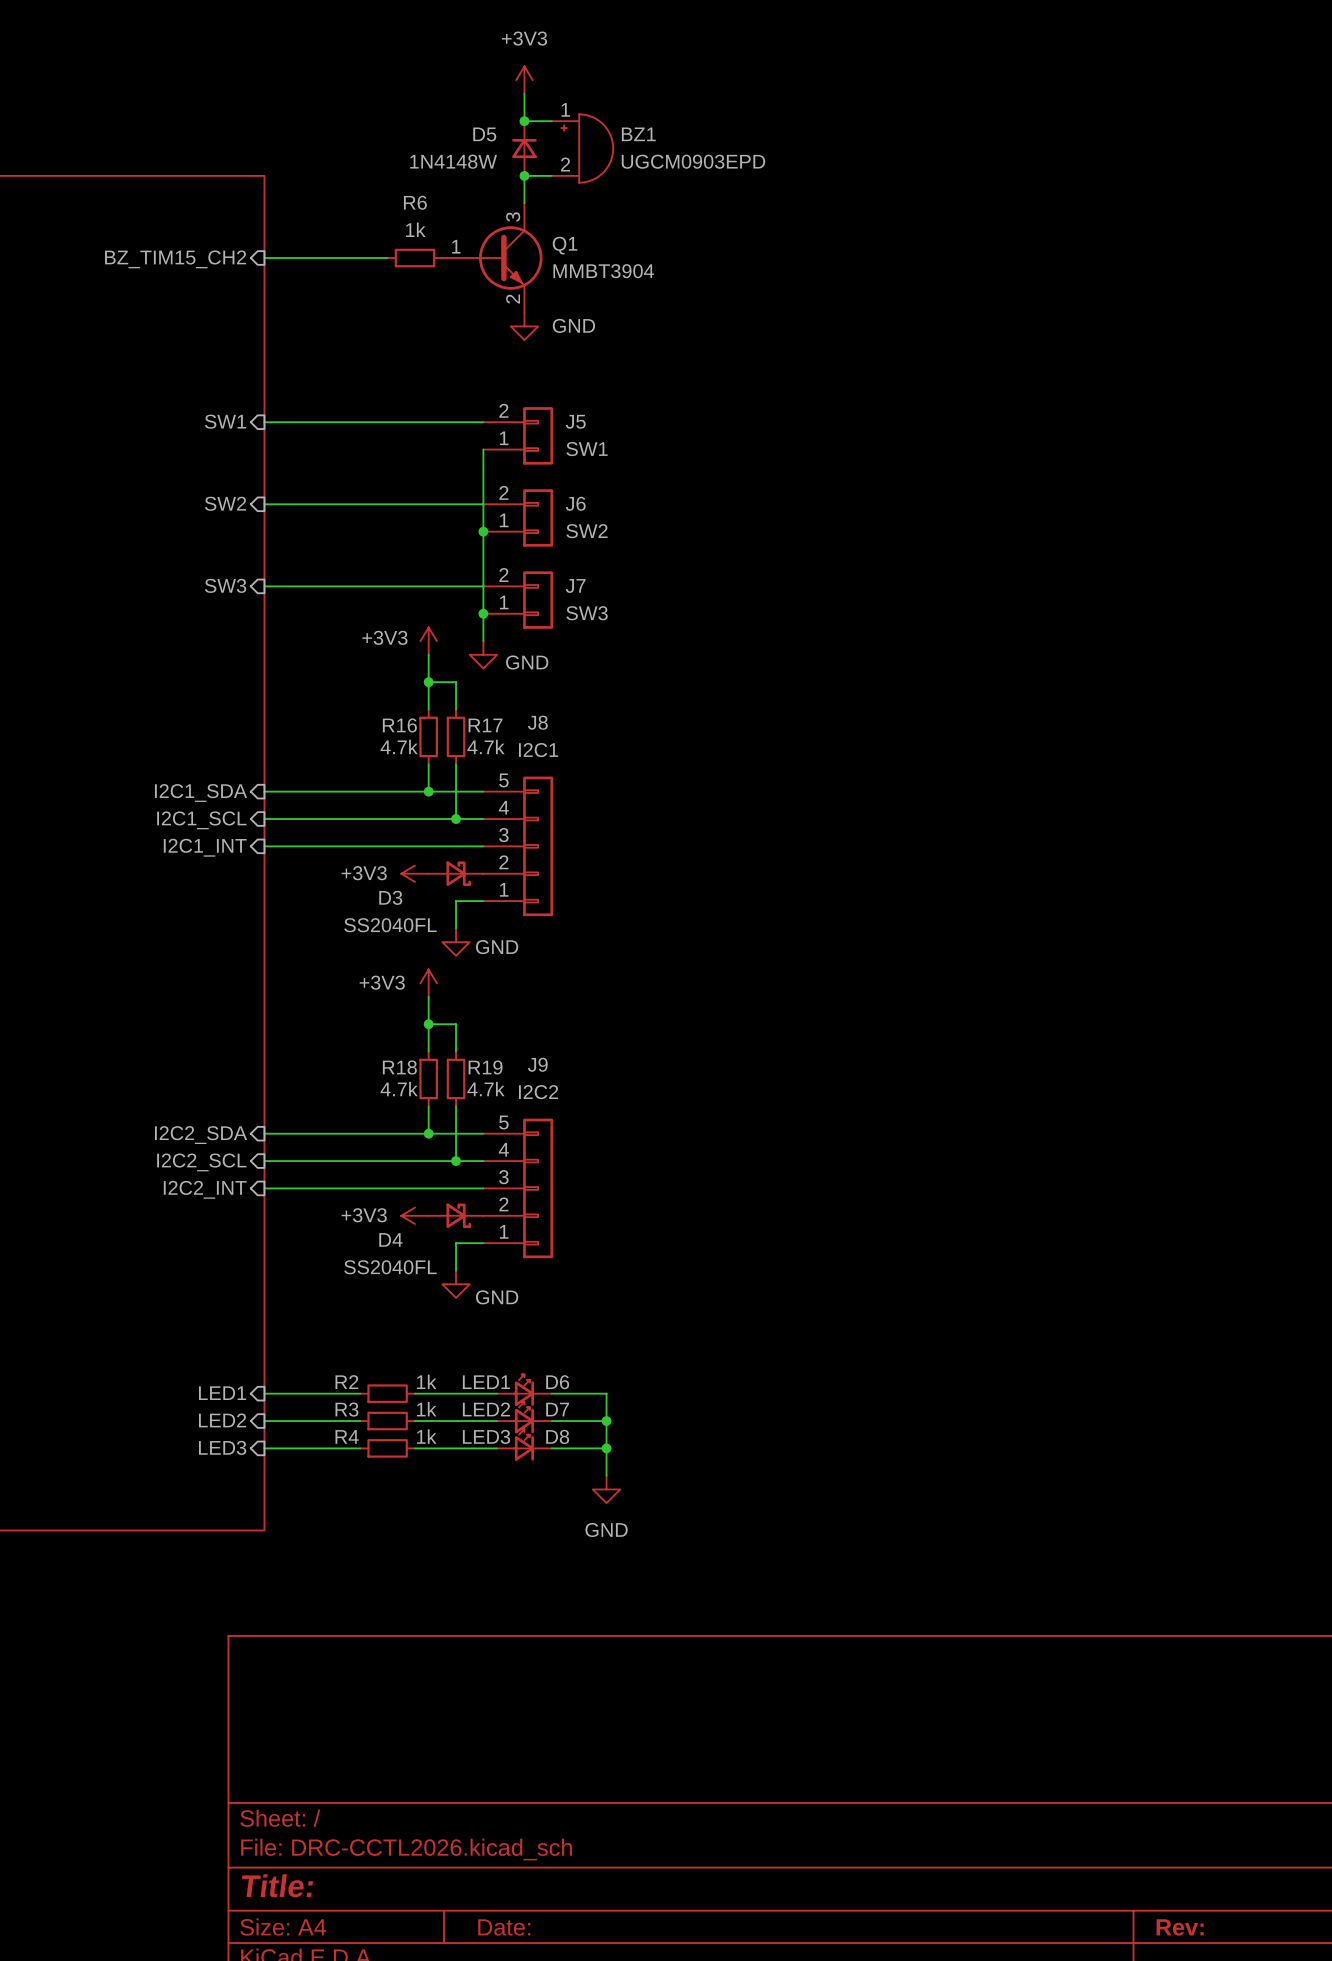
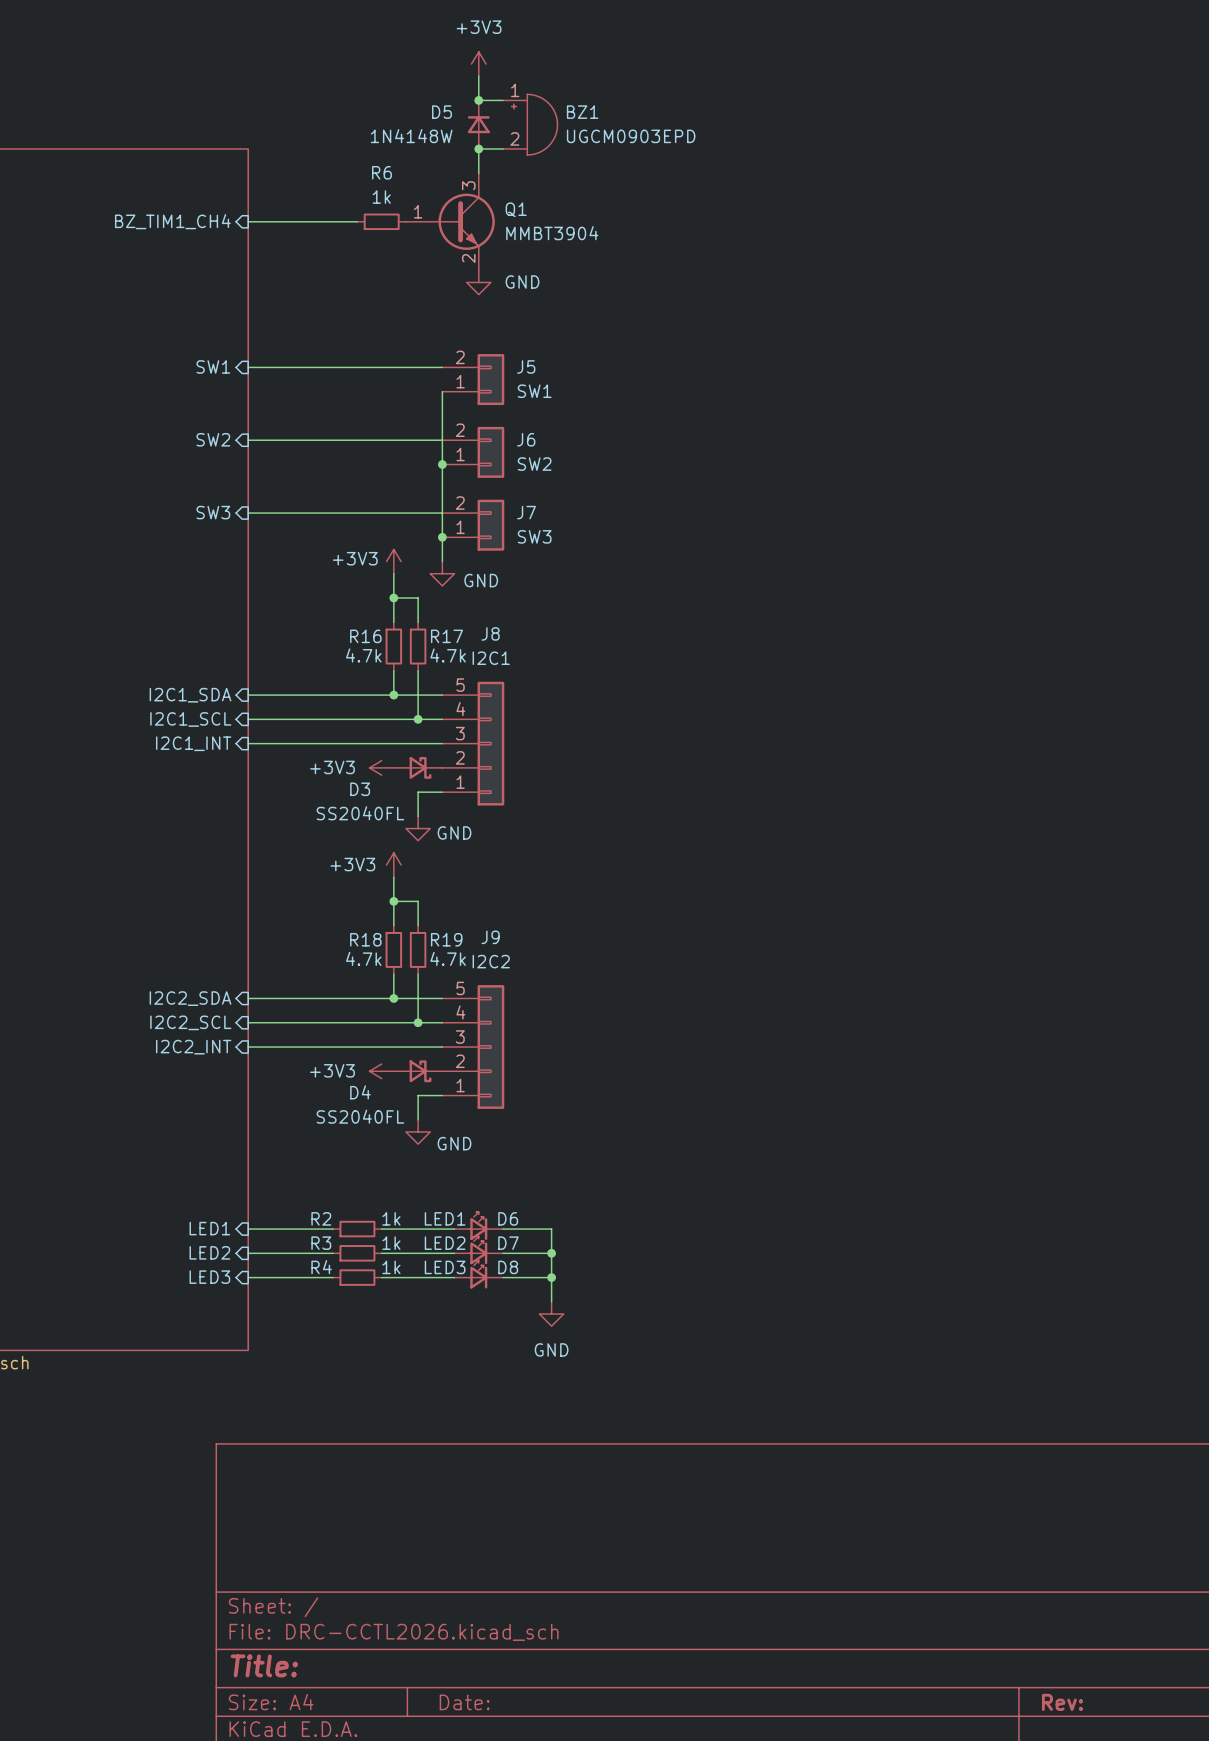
sheet pin: BZ_TIM15_CH2 (175, 259) -> BZ_TIM1_CH4 (172, 221)

